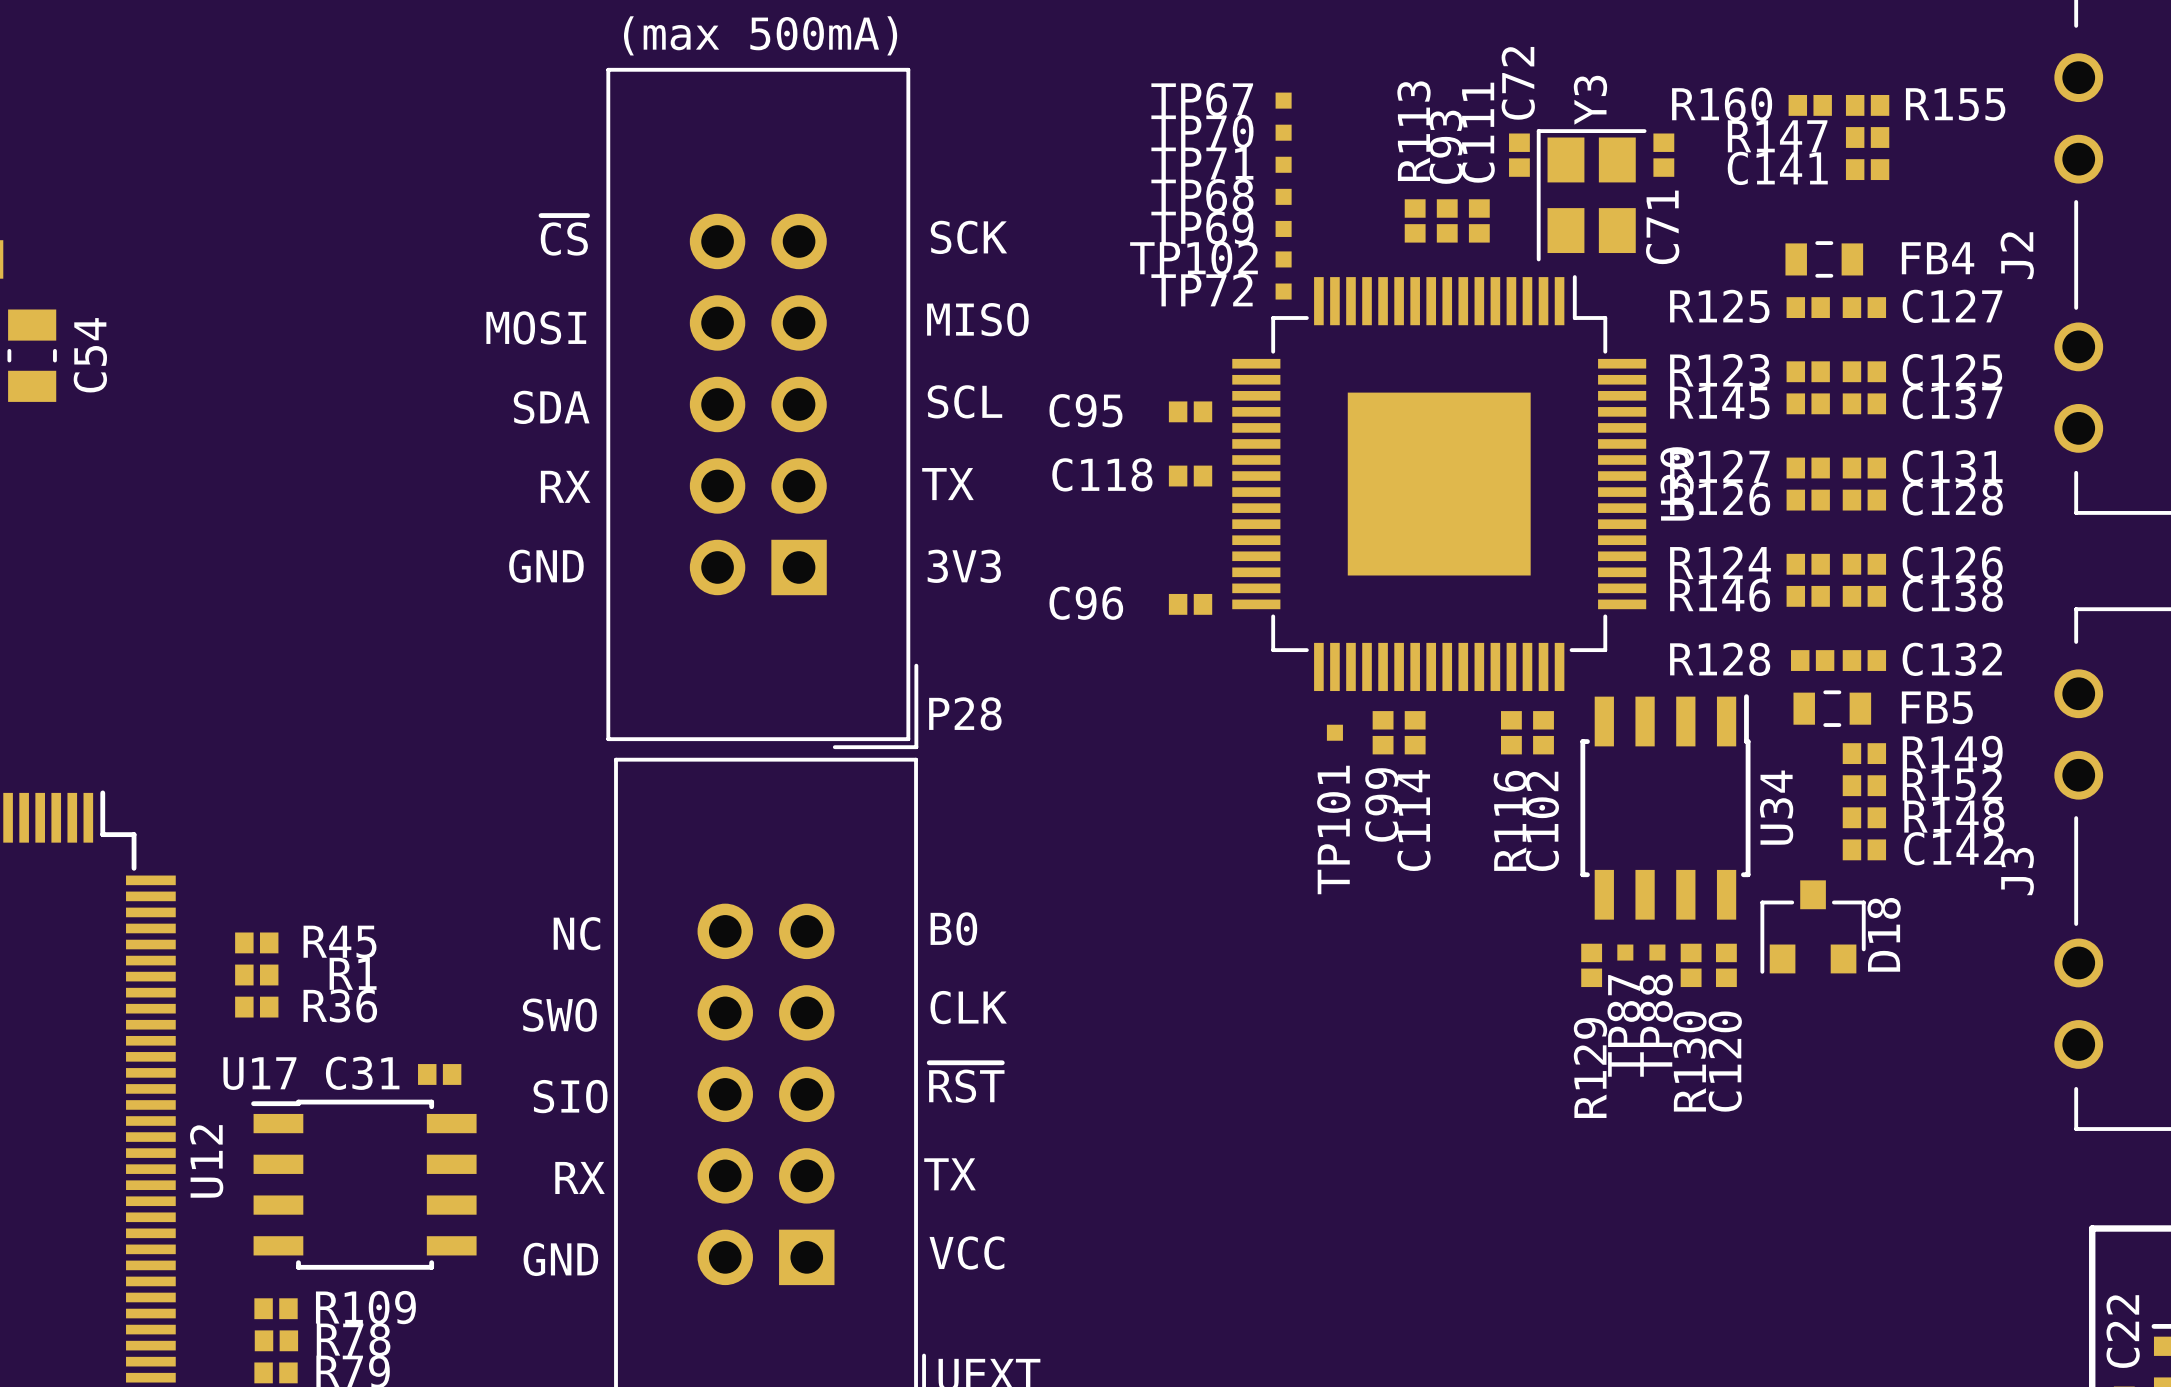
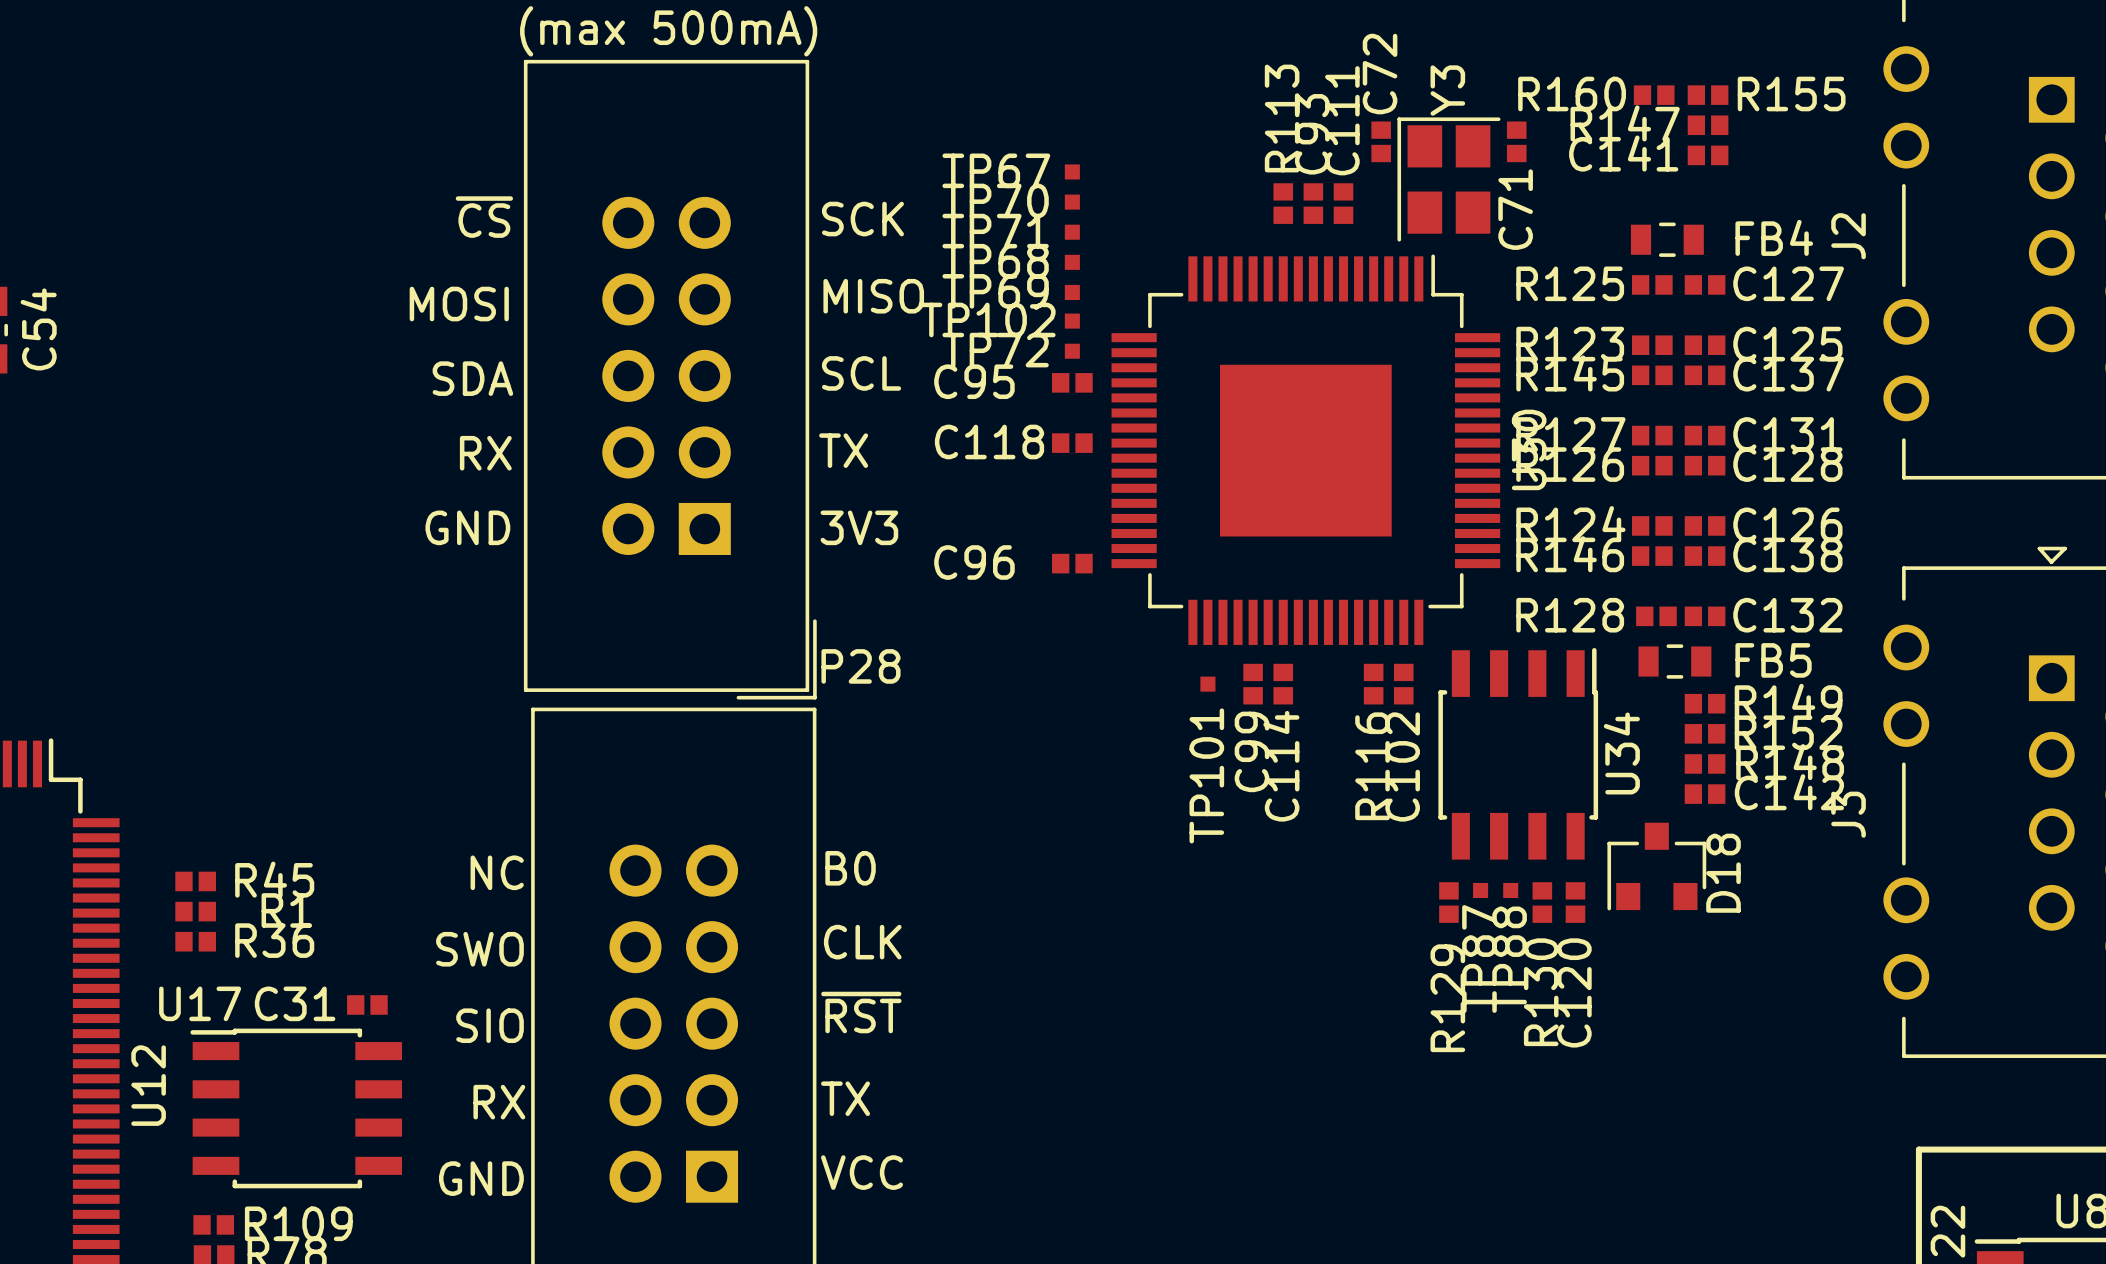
TP67 position: (1283, 100) -> (1072, 171)
TP70 position: (1283, 132) -> (1072, 202)
TP71 position: (1283, 164) -> (1072, 232)
TP68 position: (1283, 196) -> (1072, 262)
TP69 position: (1283, 228) -> (1072, 292)
TP102 position: (1283, 259) -> (1072, 321)
TP72 position: (1283, 291) -> (1072, 351)

